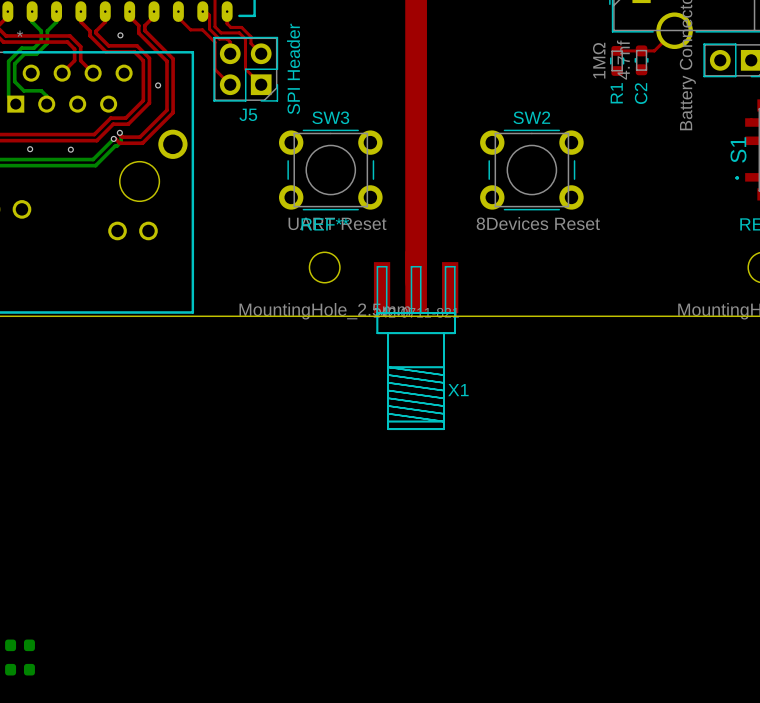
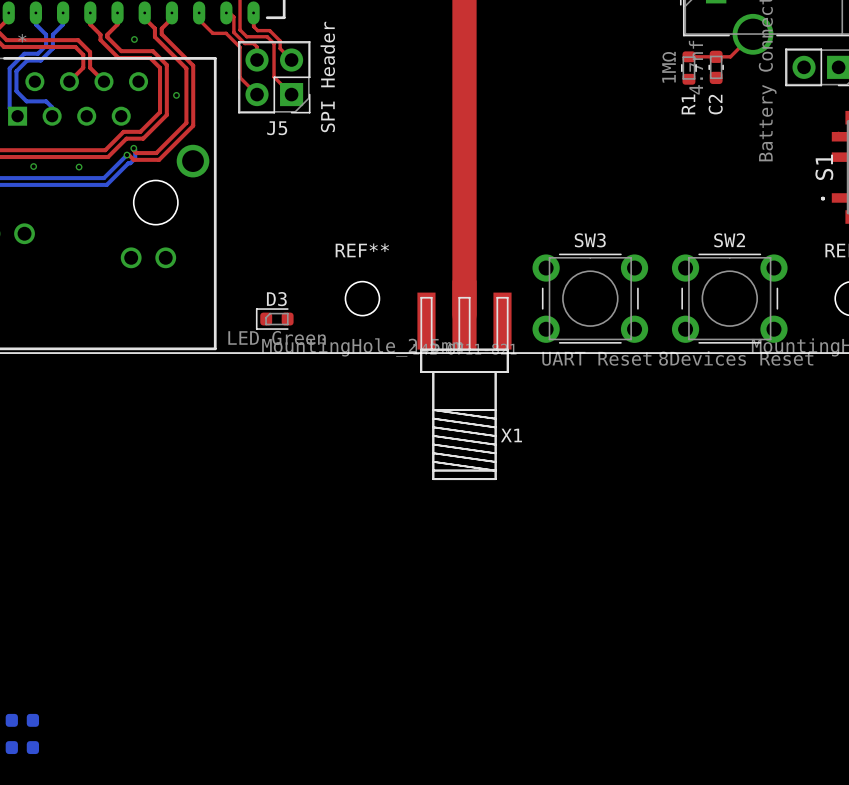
SW3 position: (330, 170) -> (590, 298)
SW2 position: (531, 170) -> (729, 298)
D3: none -> LED Green (274, 319)

